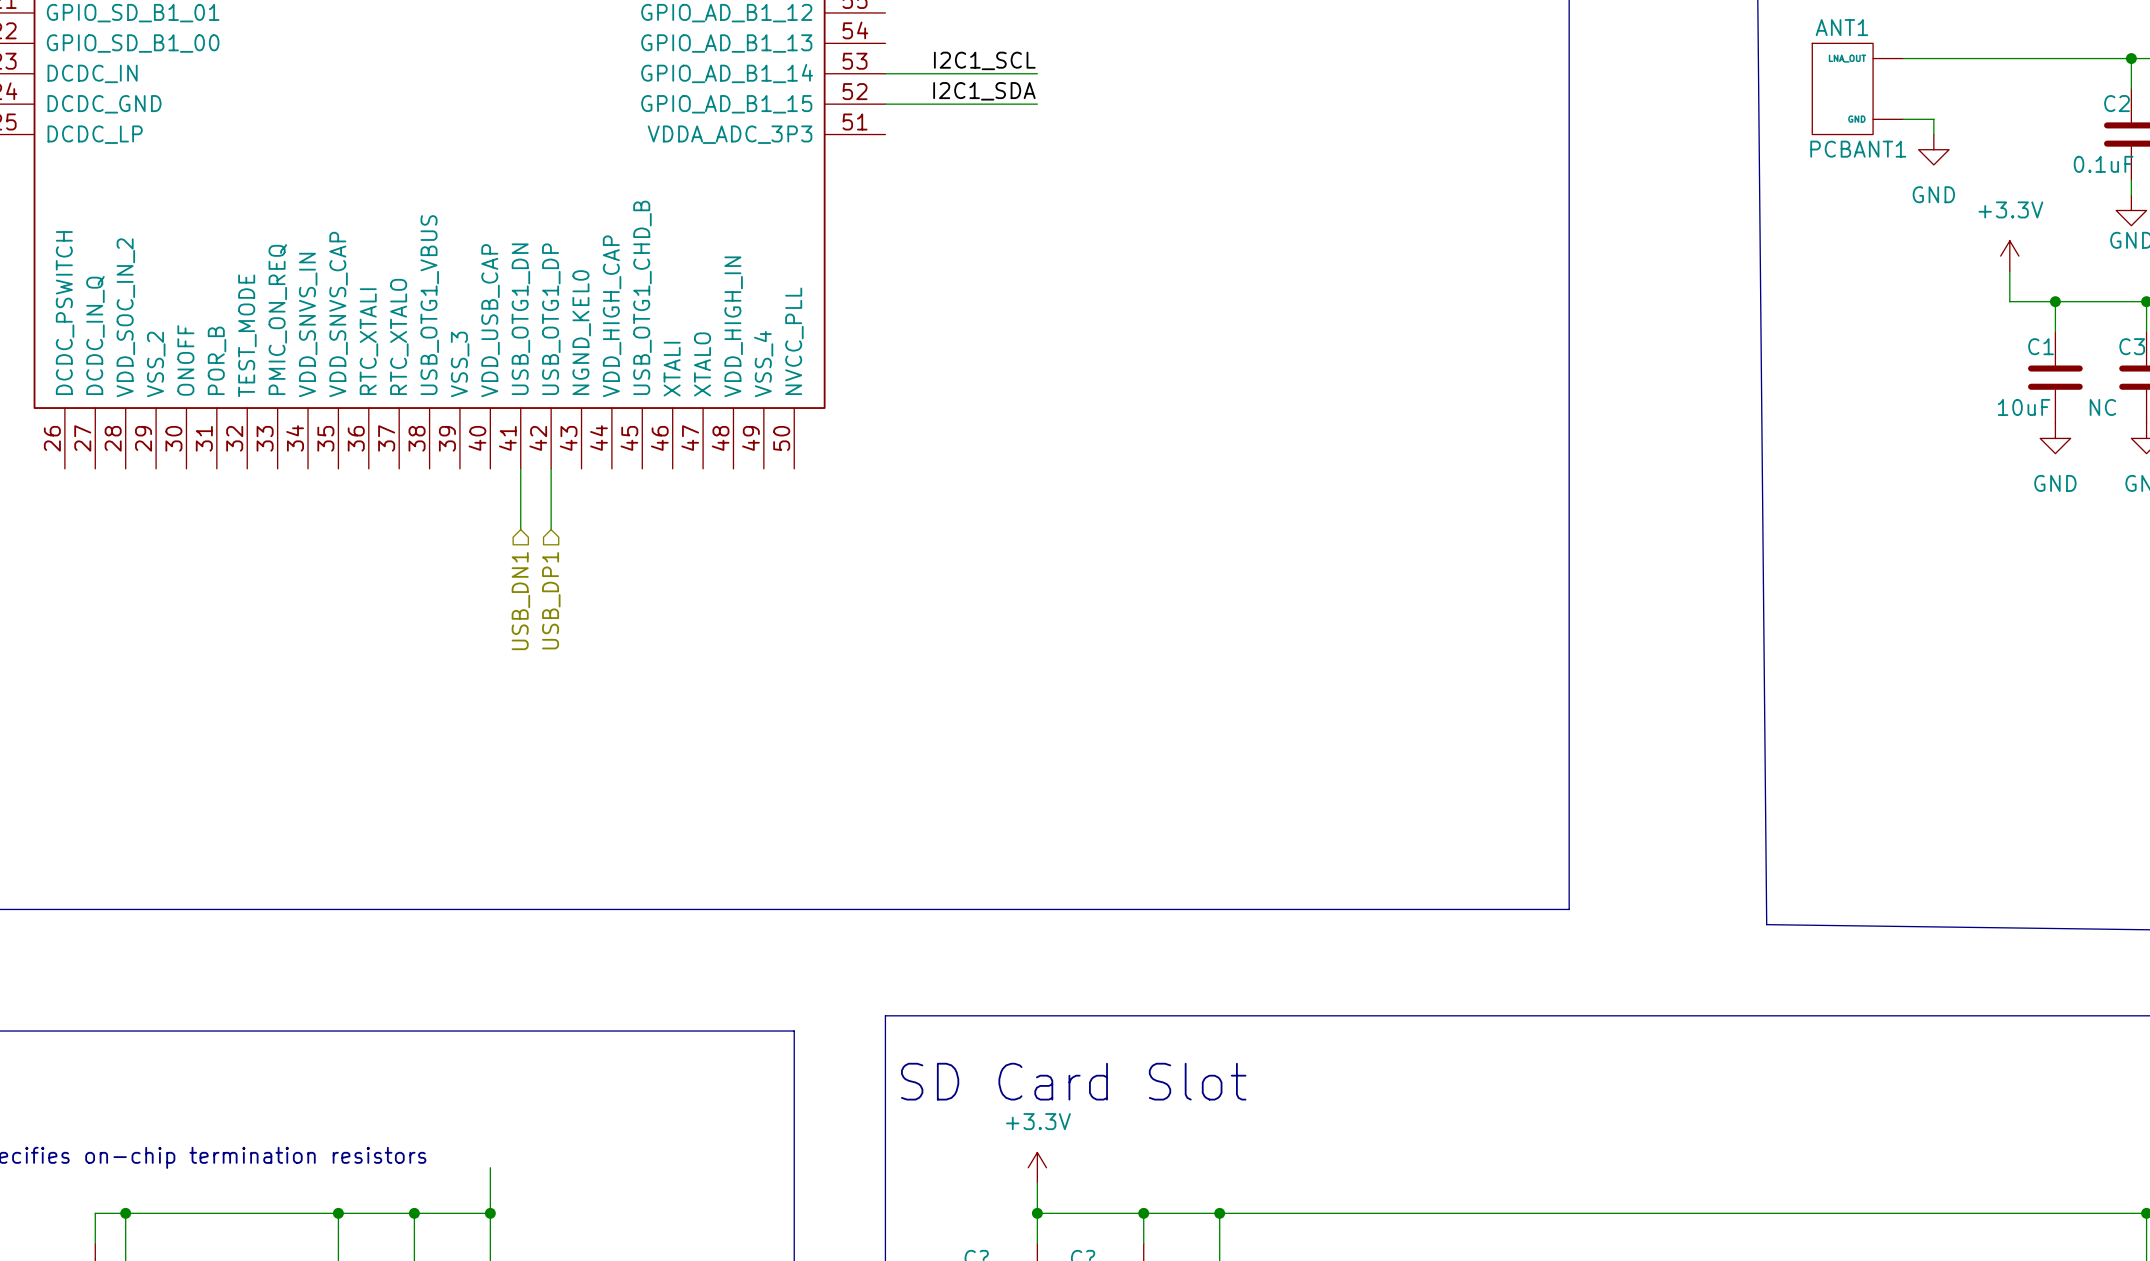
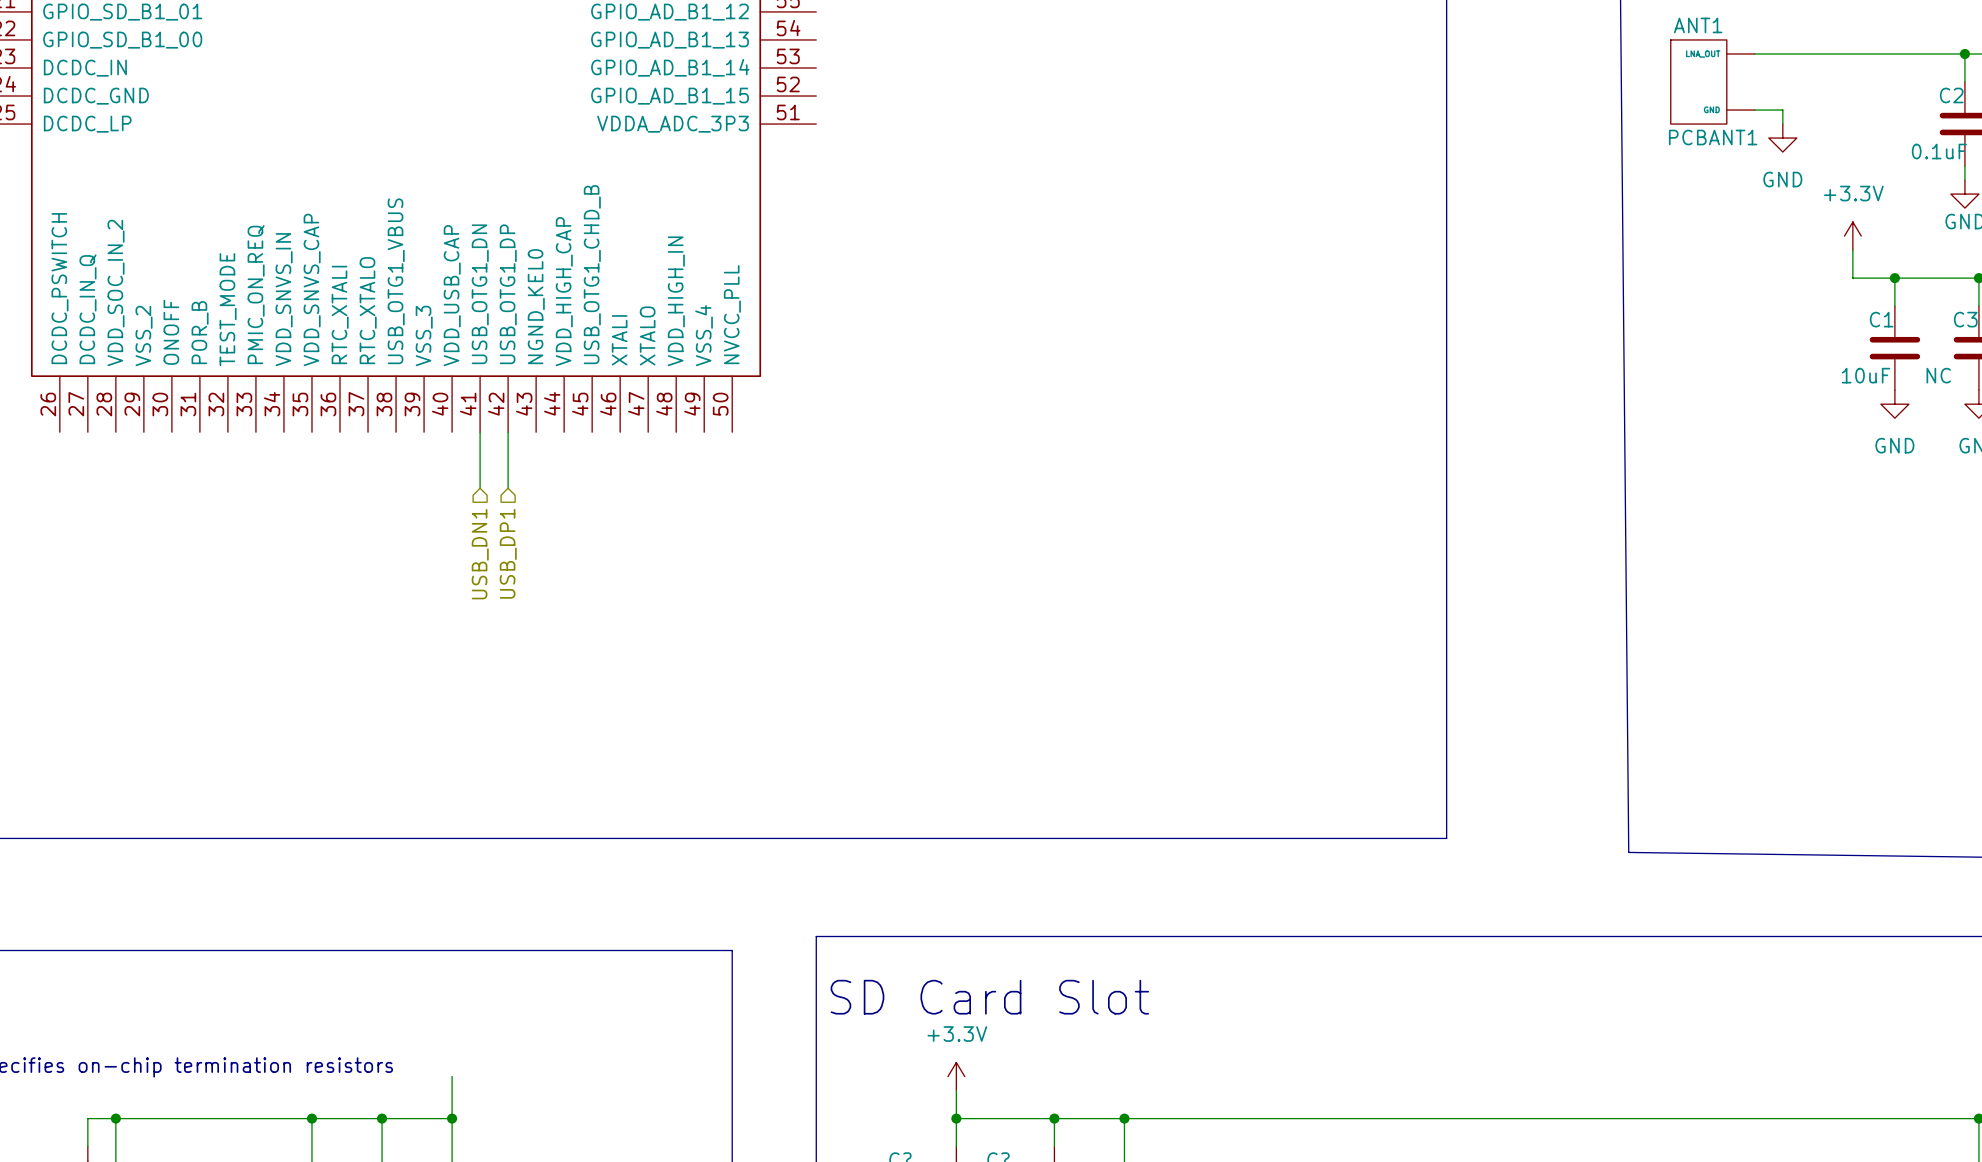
label: I2C1_SCL (984, 60) -> none
wire: (885, 73) (1037, 73) -> none
label: I2C1_SDA (984, 91) -> none
wire: (885, 104) (1037, 104) -> none

